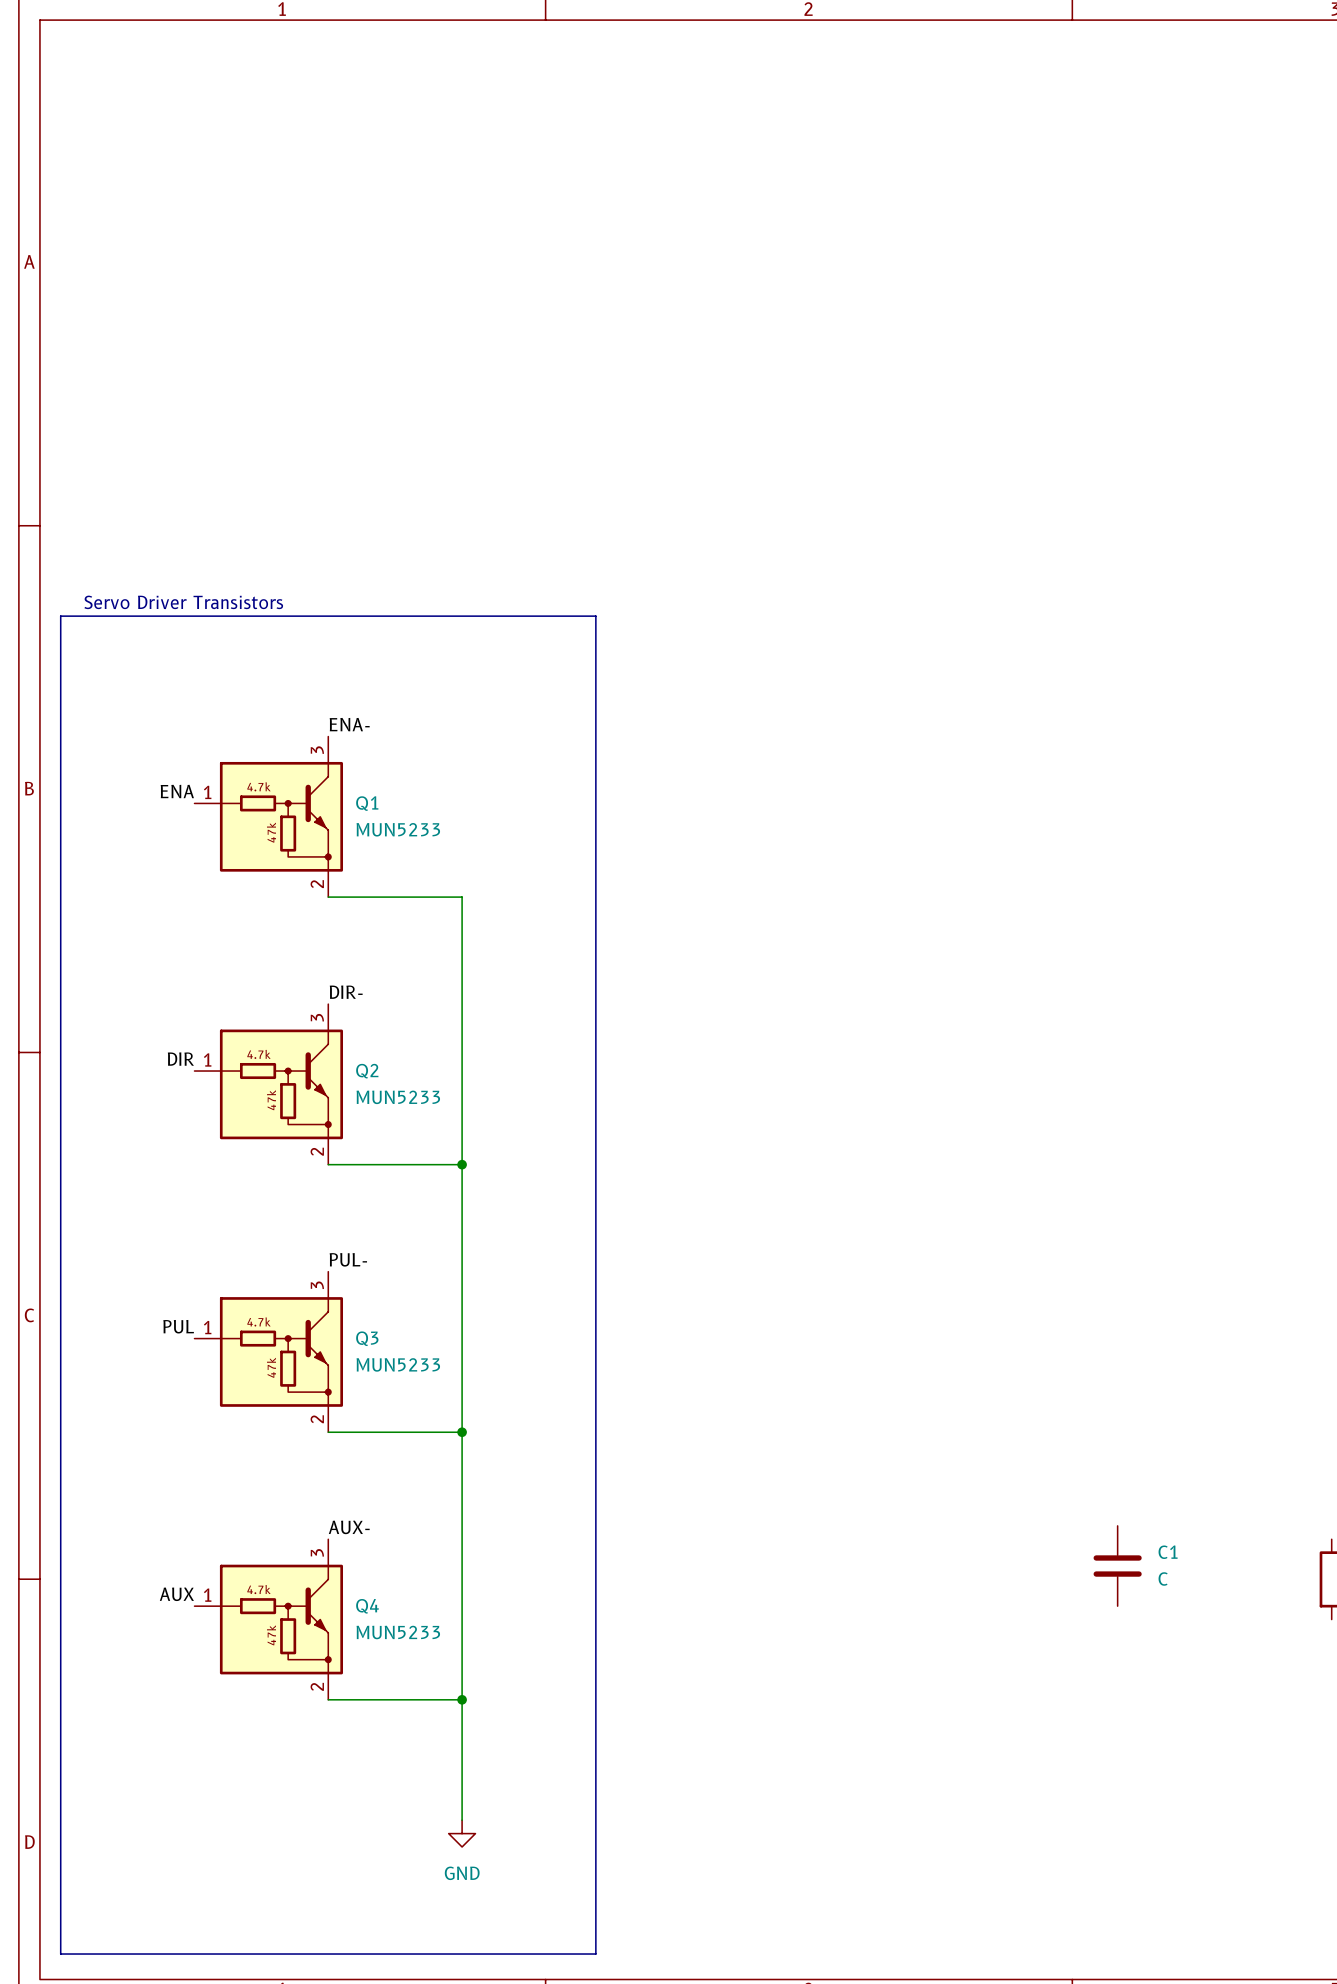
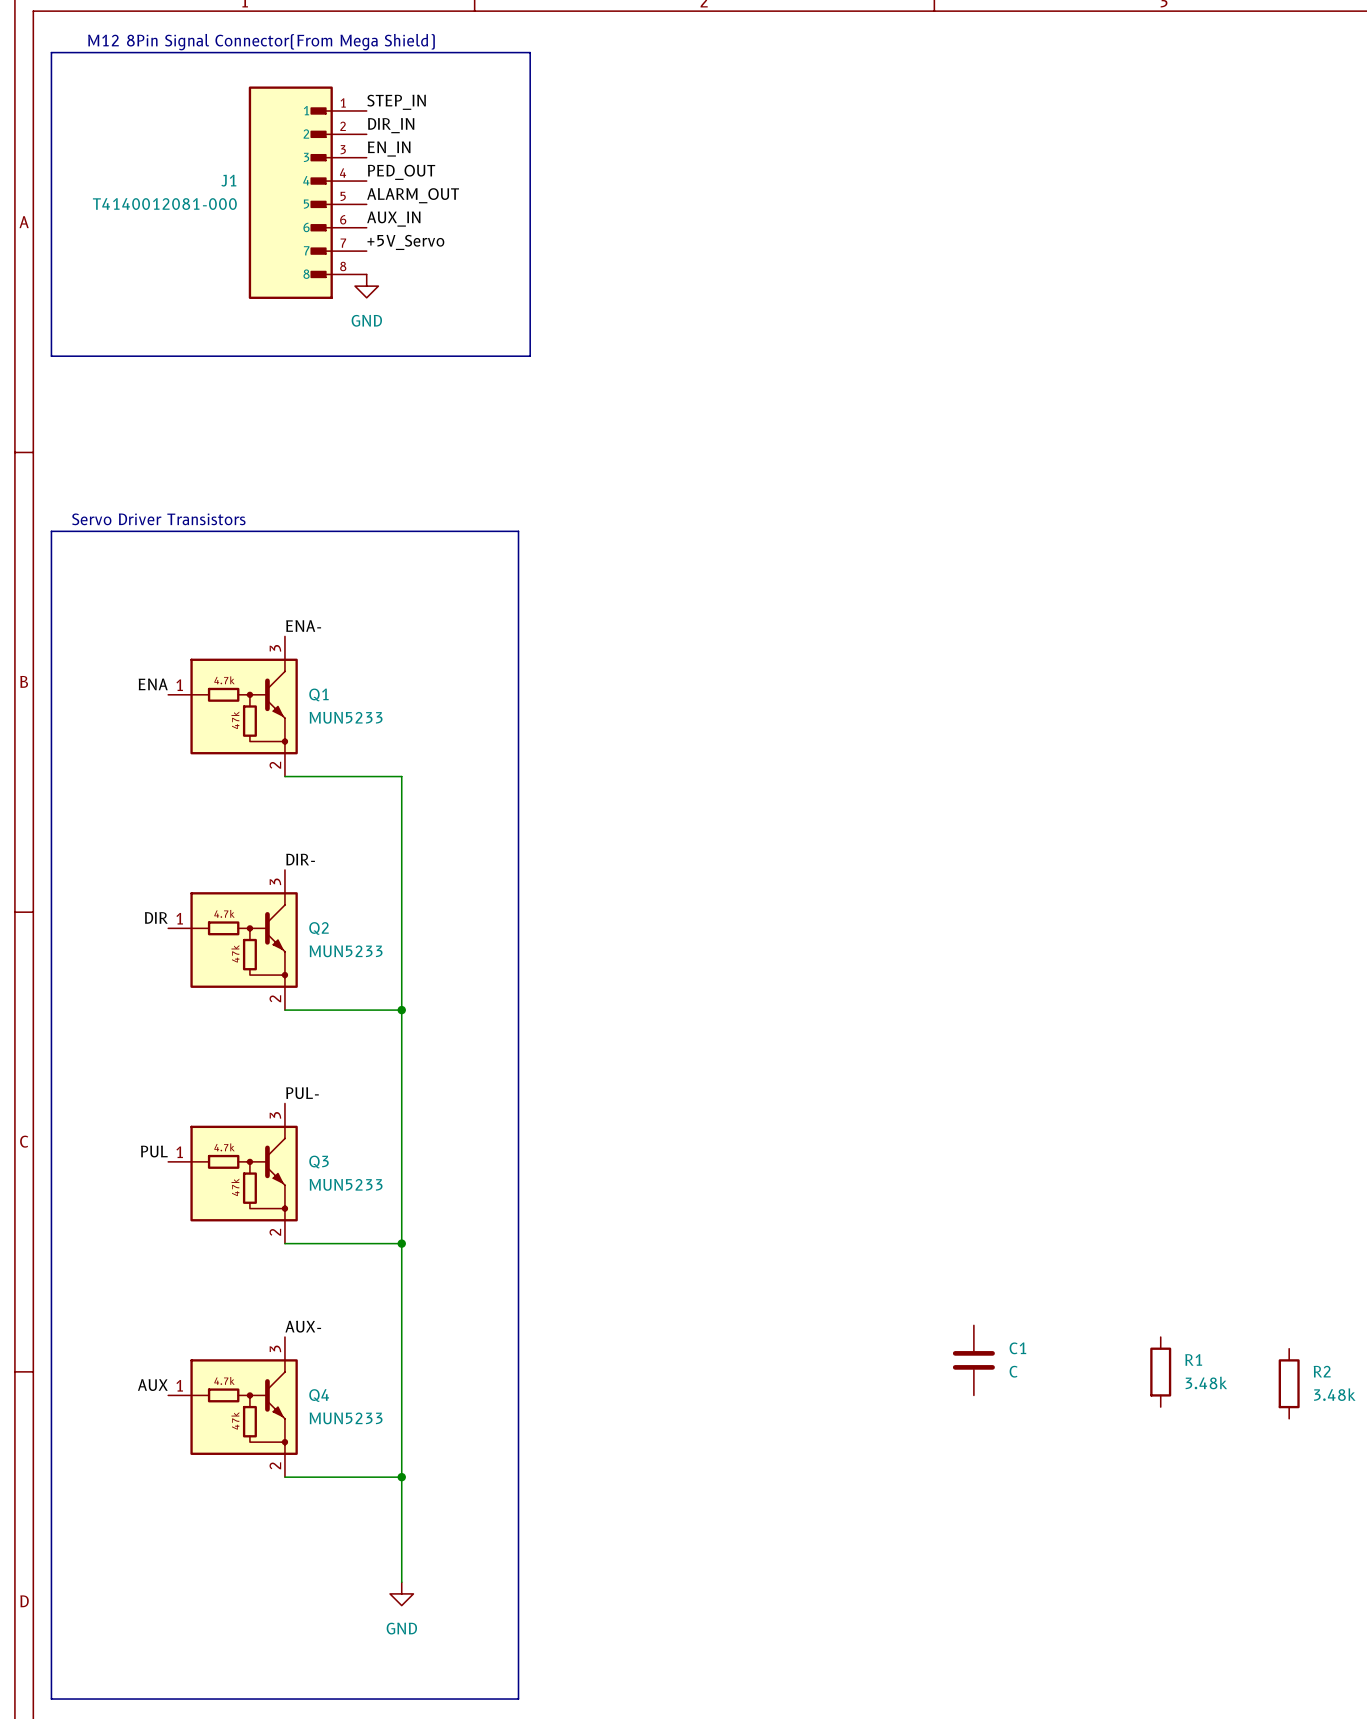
text: none -> M12 8Pin Signal Connector(From Mega Shield) (261, 42)
line: none -> (51, 52) (530, 52) (530, 356) (51, 356) (51, 52)
label: none -> STEP_IN (396, 102)
label: none -> DIR_IN (391, 125)
label: none -> EN_IN (389, 149)
label: none -> PED_OUT (401, 172)
J1: none -> T4140012081-000 (307, 192)
label: none -> ALARM_OUT (413, 195)
label: none -> AUX_IN (393, 219)
label: none -> +5V_Servo (405, 242)
power symbol: none -> GND (366, 286)

